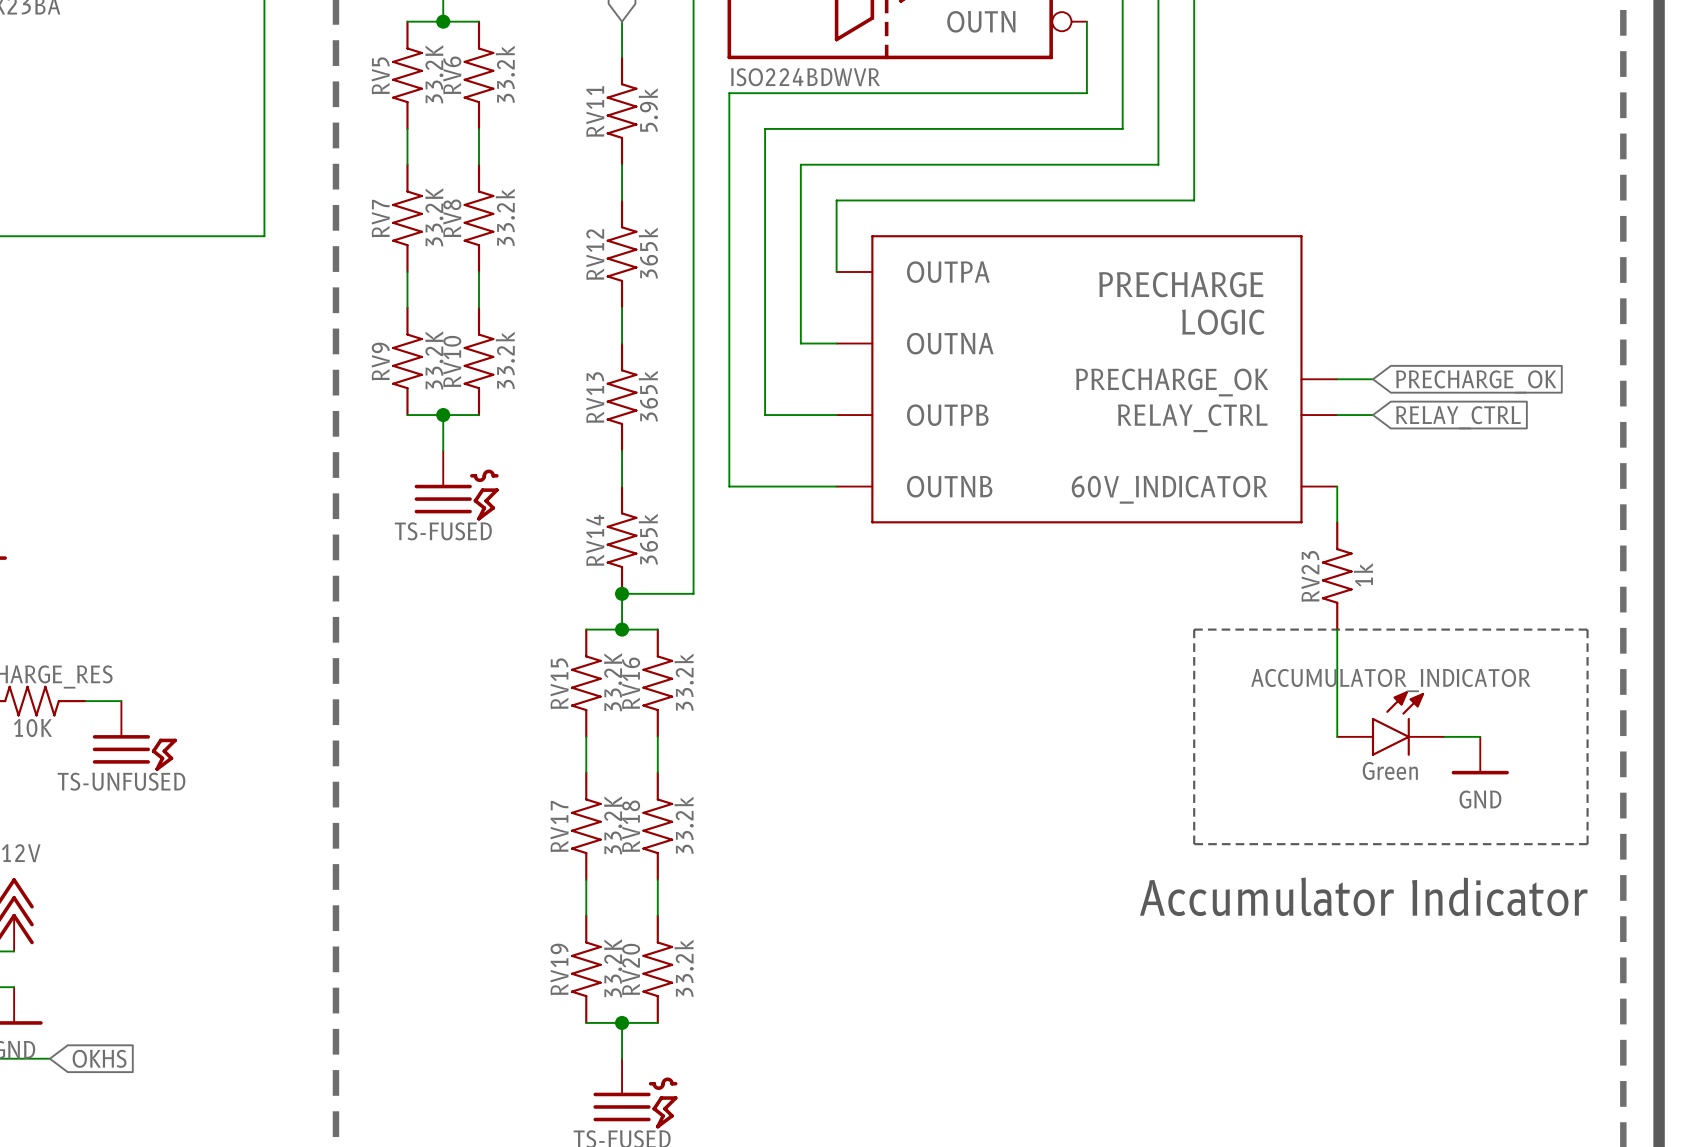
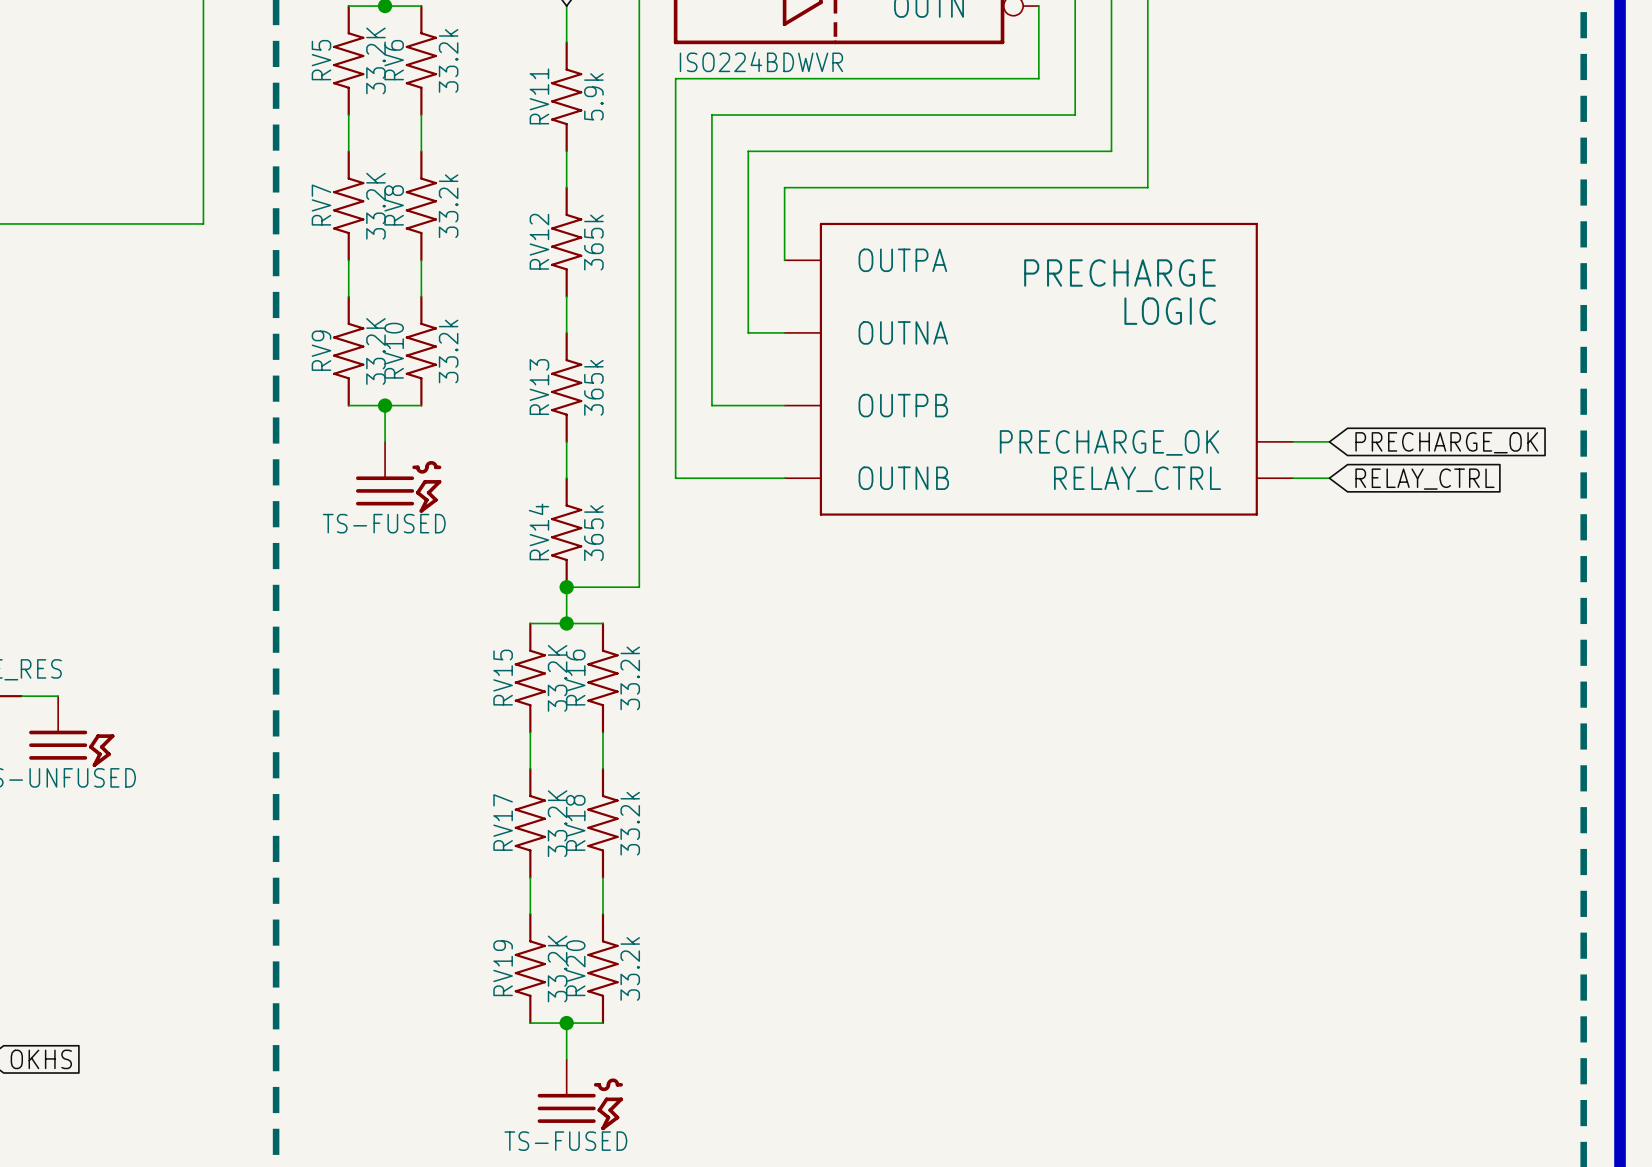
part symbol: [836, 235, 1338, 524] -> [784, 222, 1294, 516]
wire: (1337, 379) (1373, 379) -> (1293, 441) (1329, 441)
global label position: PRECHARGE_OK (1476, 381) -> PRECHARGE_OK (1446, 442)
wire: (1337, 415) (1373, 415) -> none
global label position: RELAY_CTRL (1458, 417) -> RELAY_CTRL (1424, 479)
wire: (1337, 486) (1337, 522) -> (1293, 478) (1329, 478)
RV23: 1k (1337, 575) -> none
line: (1194, 629) (1587, 629) (1587, 844) (1194, 844) (1194, 629) -> none
wire: (1337, 629) (1337, 736) -> none
ACCUMULATOR_INDICATOR: (1390, 723) -> none
wire: (1444, 736) (1480, 736) -> none
power symbol: GND (1480, 755) -> none
text: Accumulator Indicator (1363, 896) -> none

